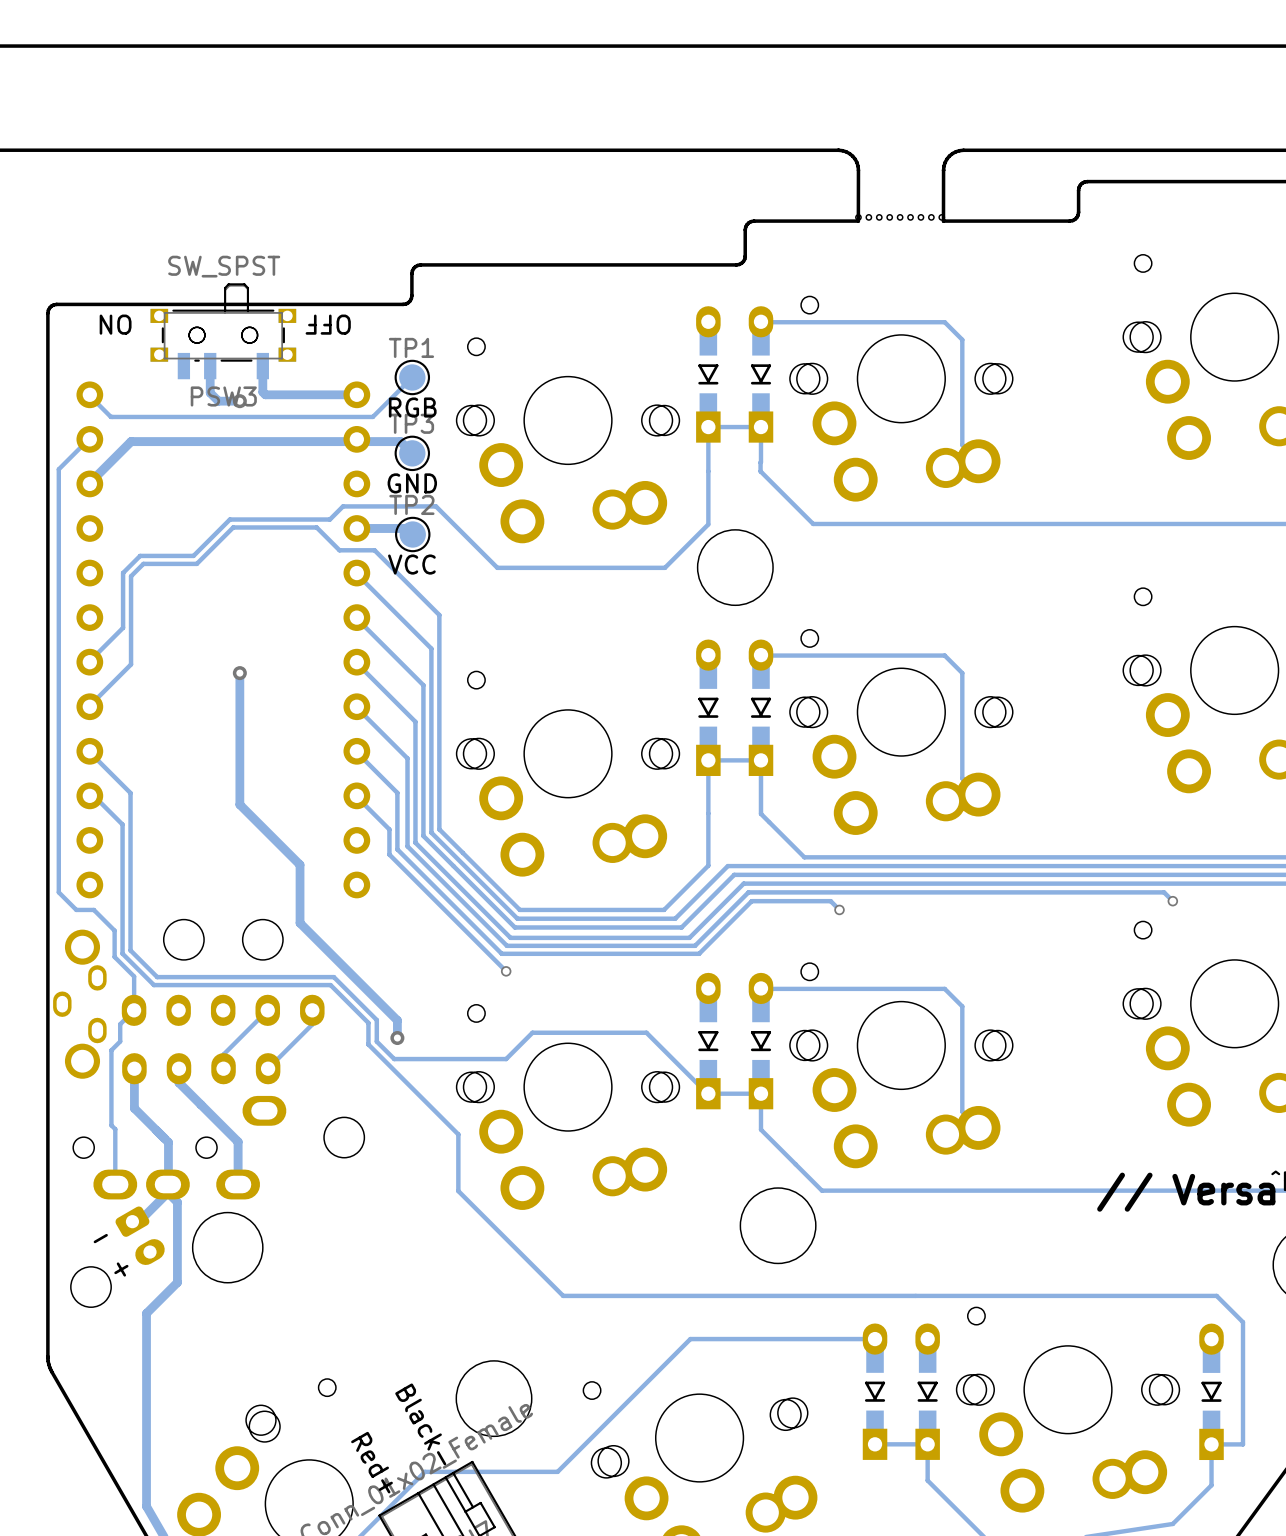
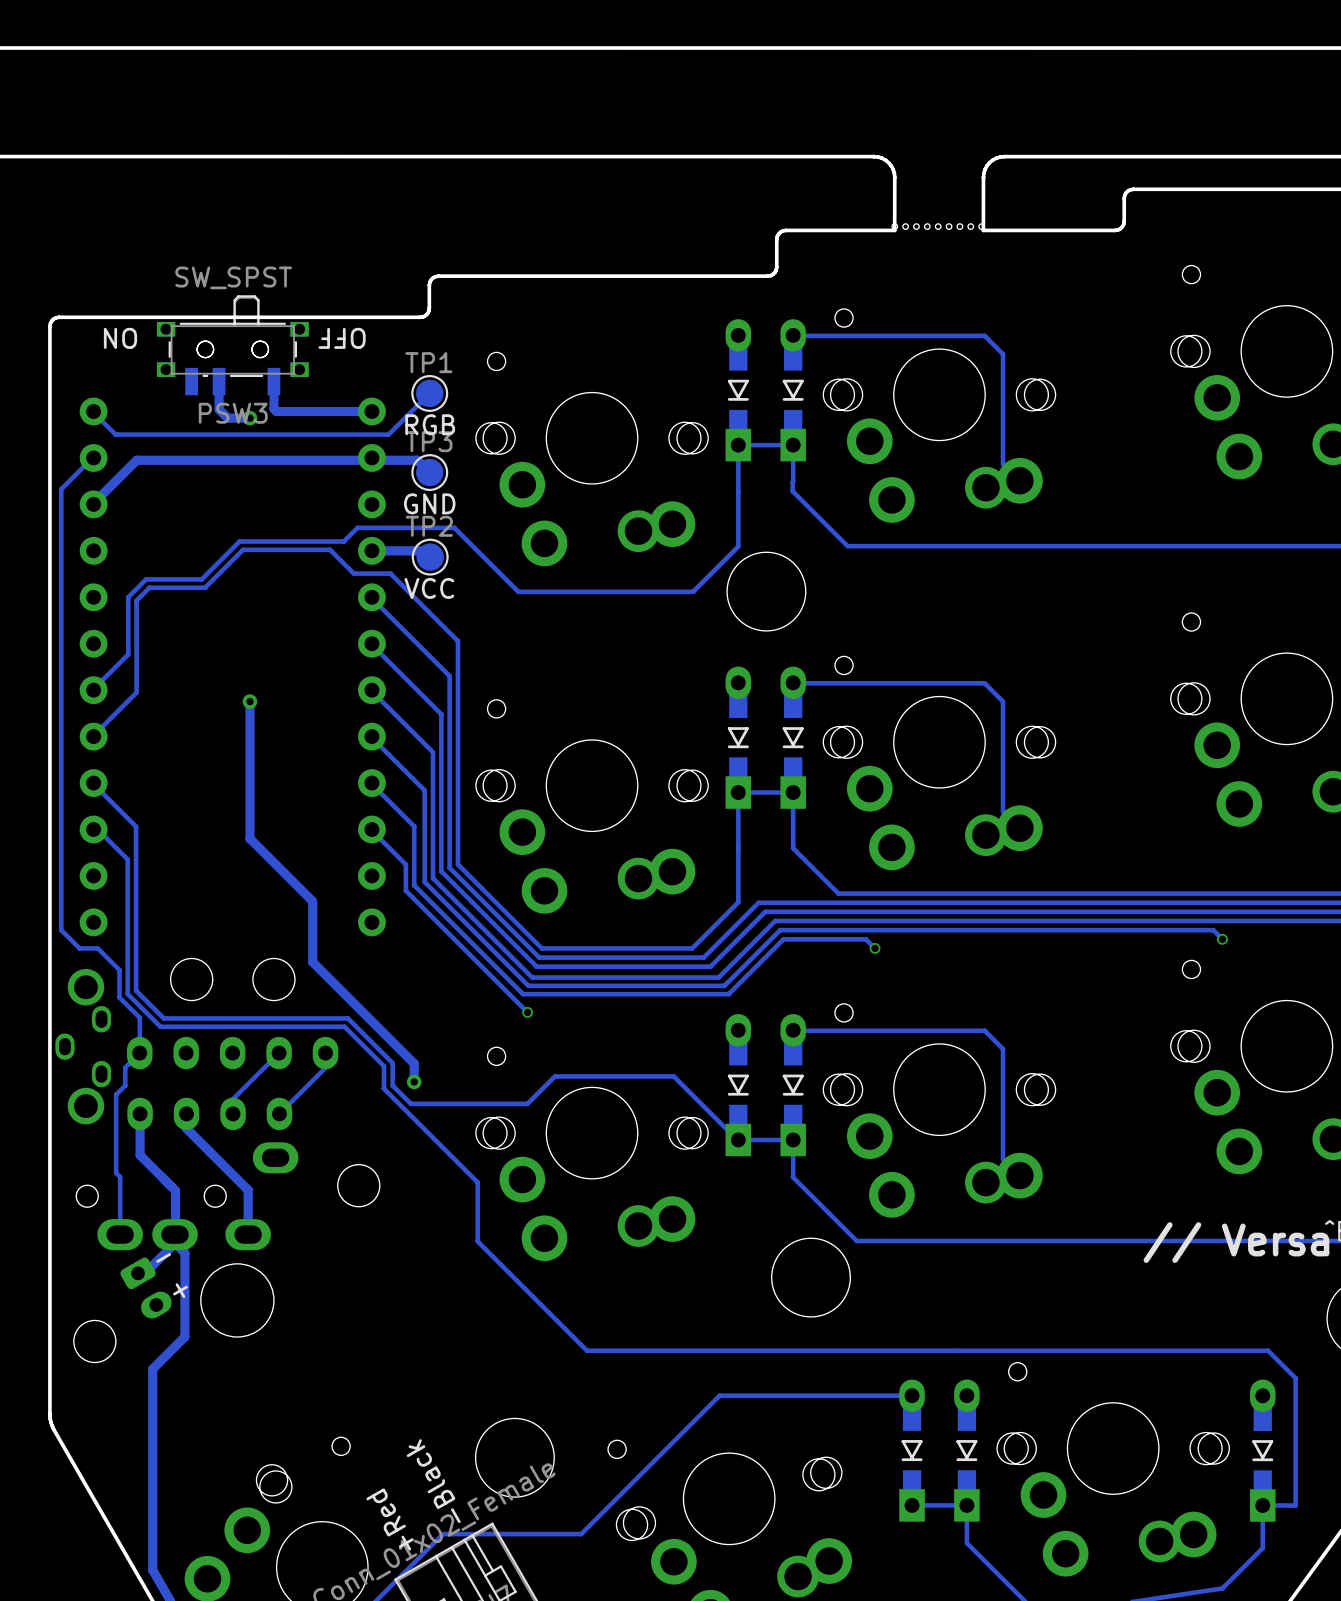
text position: - (100, 1238) -> - (163, 1258)
text position: + (121, 1269) -> + (180, 1290)
text: Black- (420, 1424) -> -Black (433, 1481)
text: Red+ (372, 1462) -> +Red (390, 1519)

